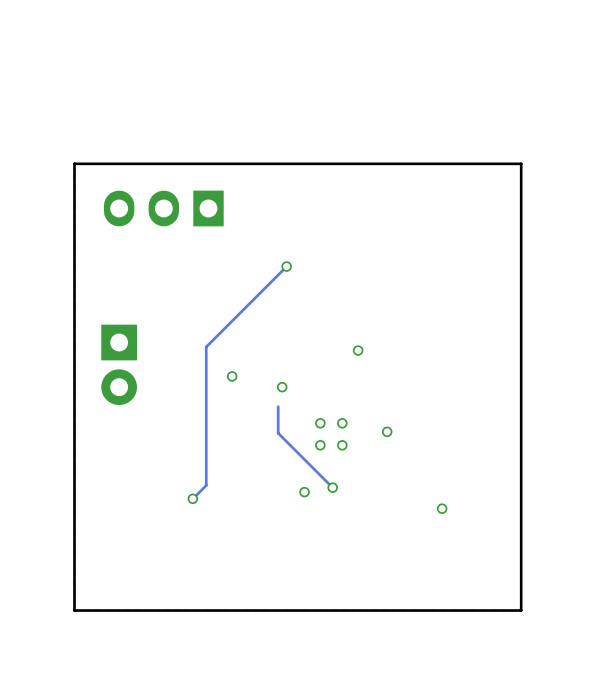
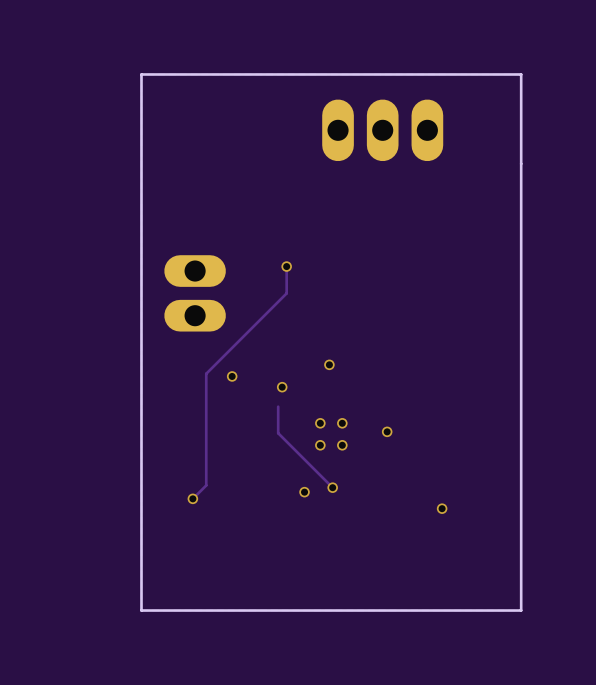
part: none -> (382, 130)
board edge: (521, 163) (74, 163) (74, 610) (141, 610) -> (521, 163) (521, 74) (141, 74) (141, 610)
part: (163, 208) -> none
track: (286, 266) (206, 346) (206, 373) -> (286, 266) (286, 293) (206, 373)
part: none -> (195, 293)
via position: (358, 350) -> (329, 364)
part: (119, 364) -> none

